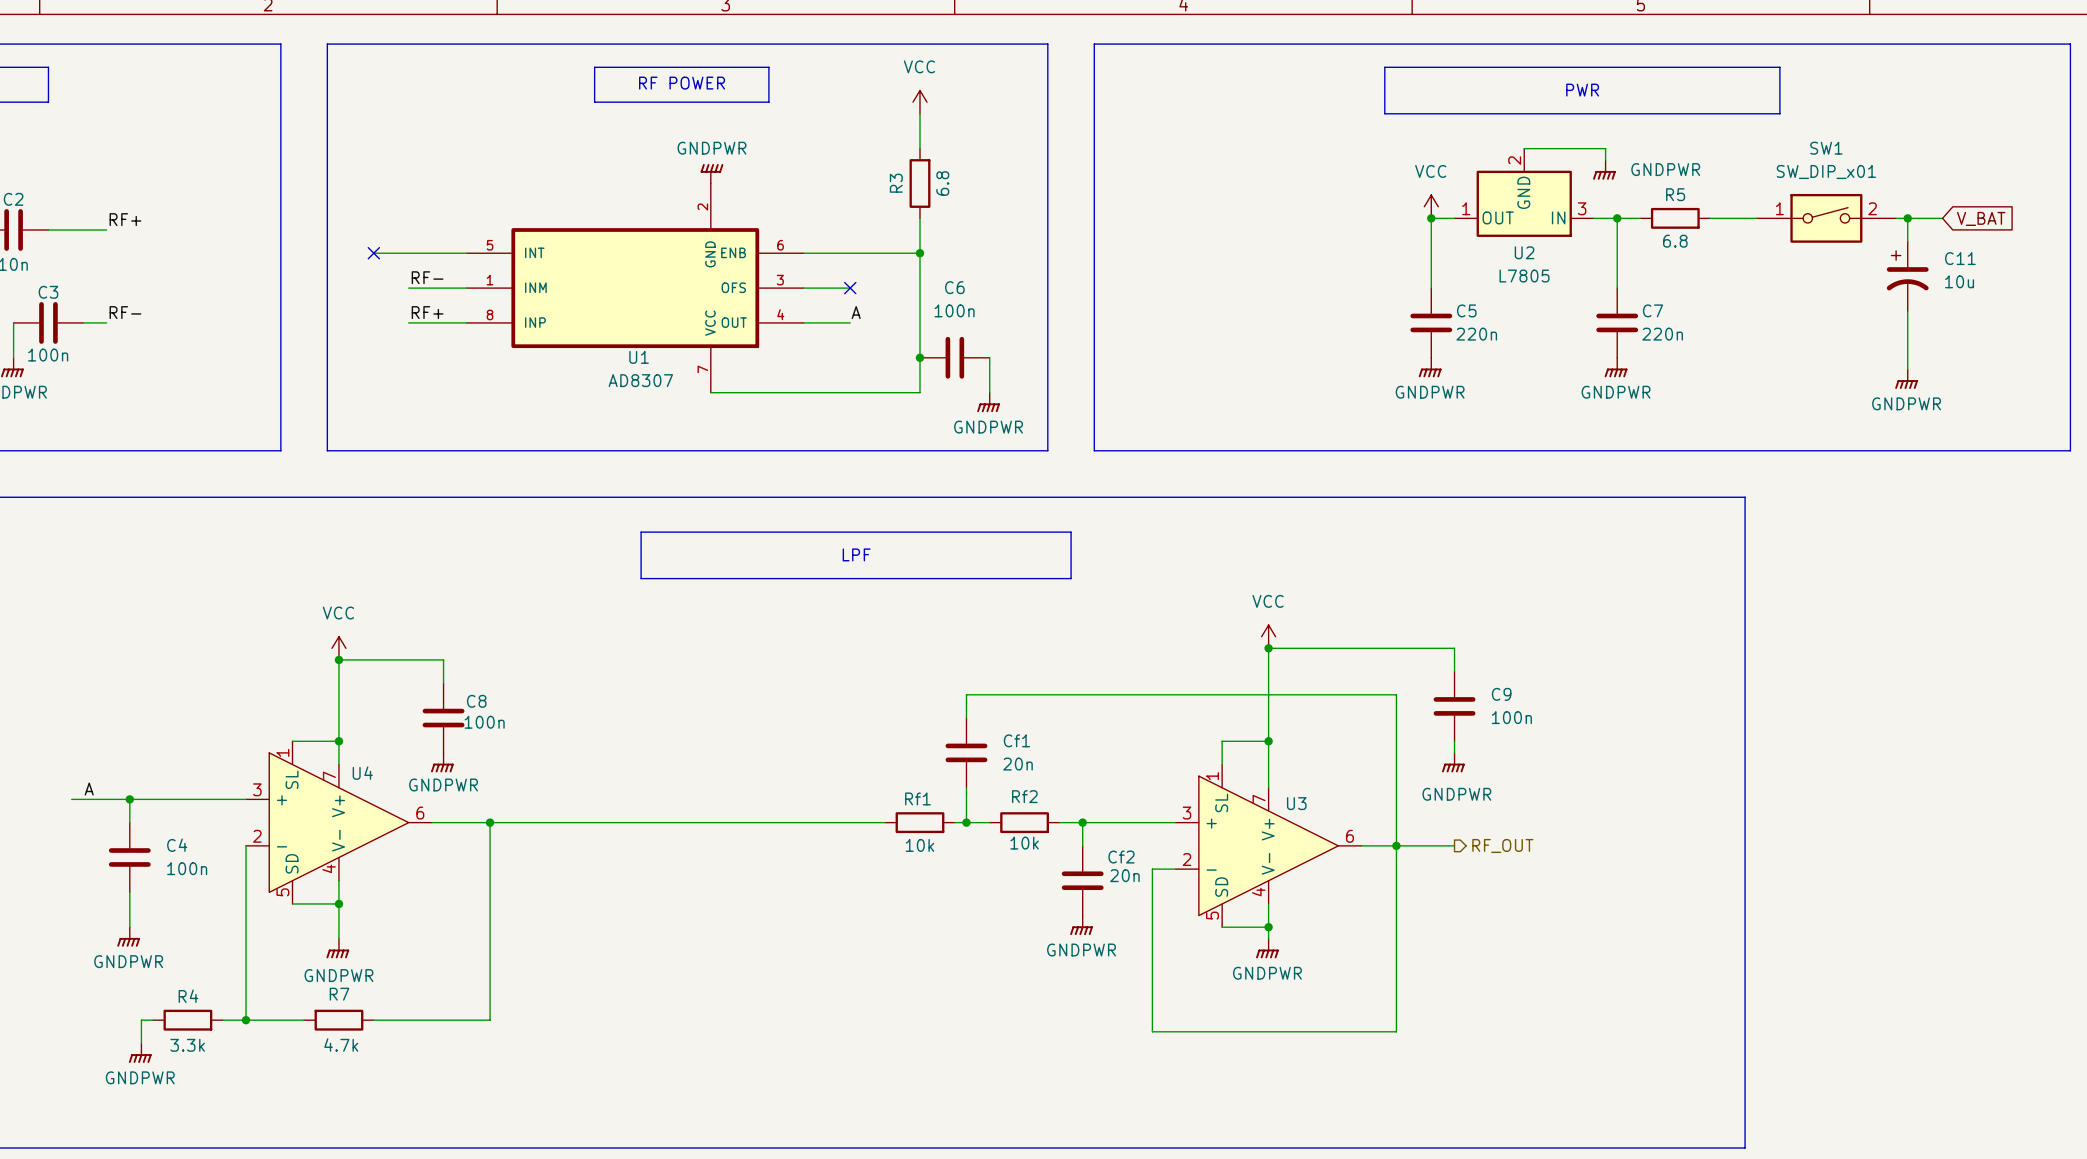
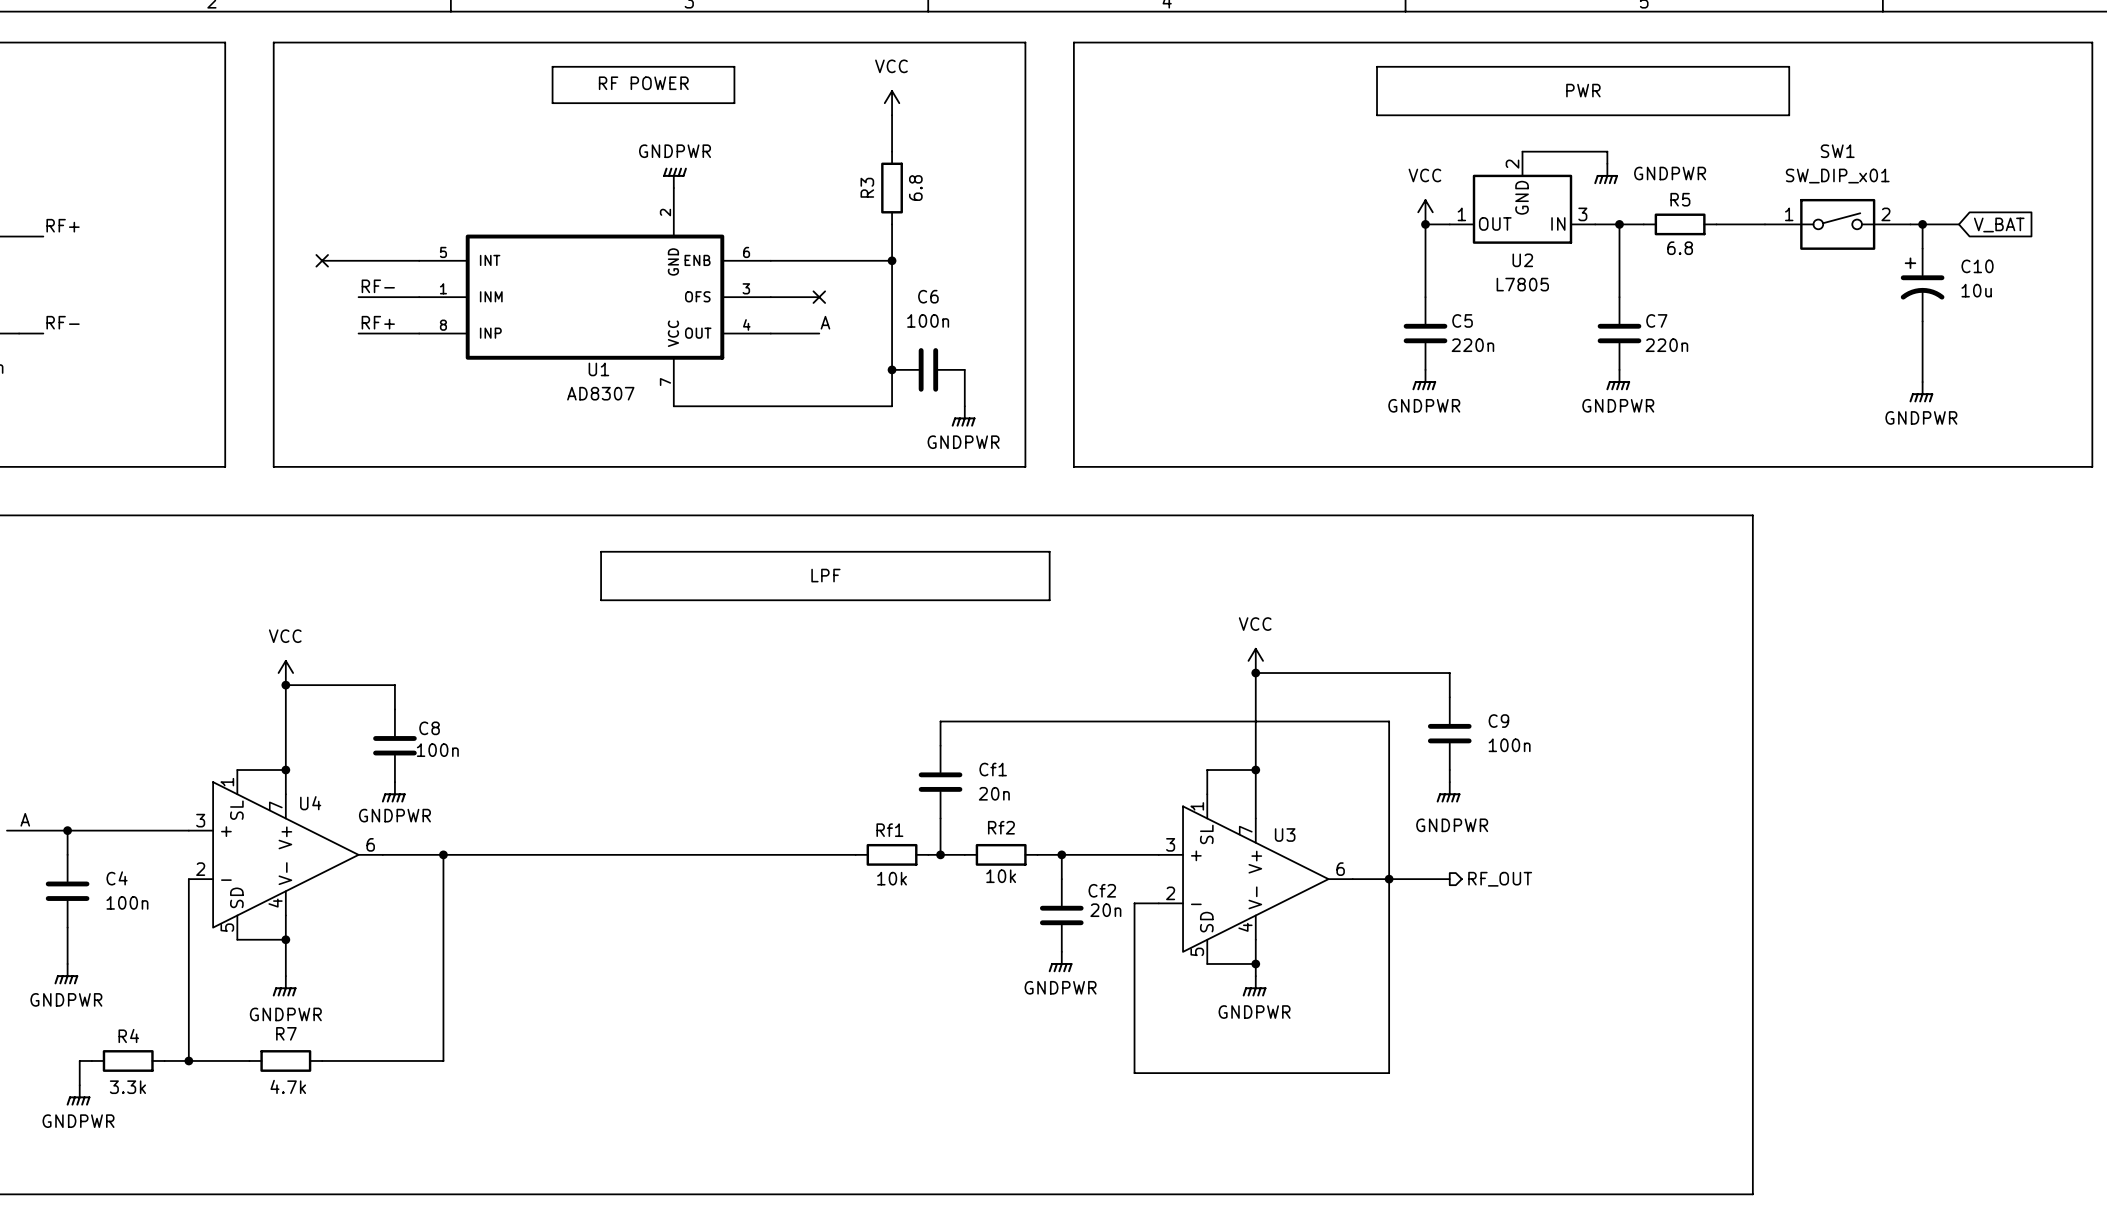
C11 name: C11 (1960, 258) -> C10 (1977, 266)

